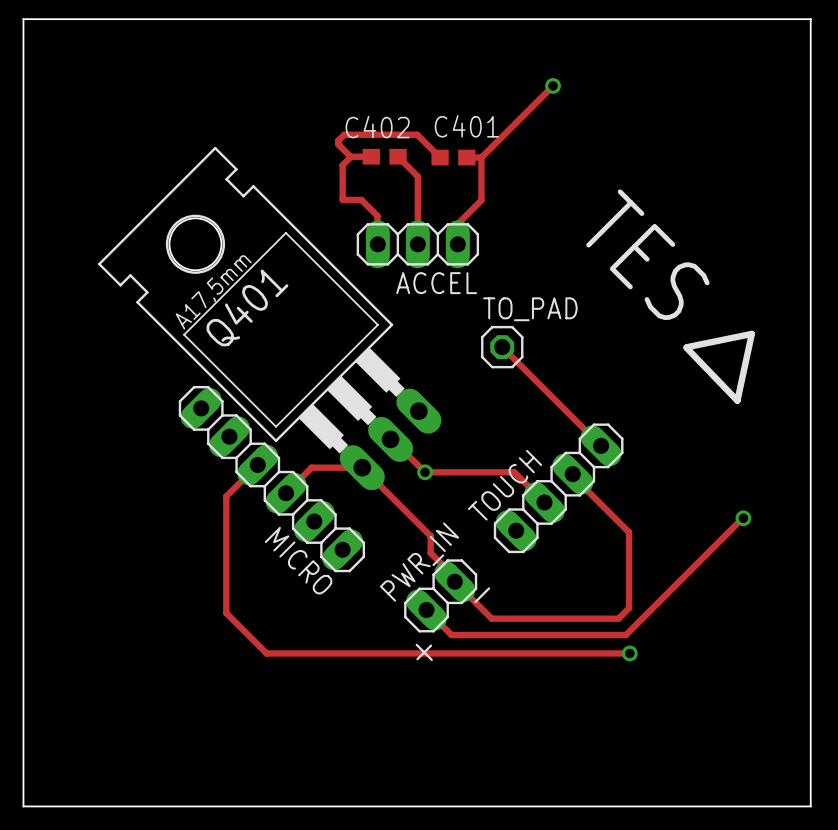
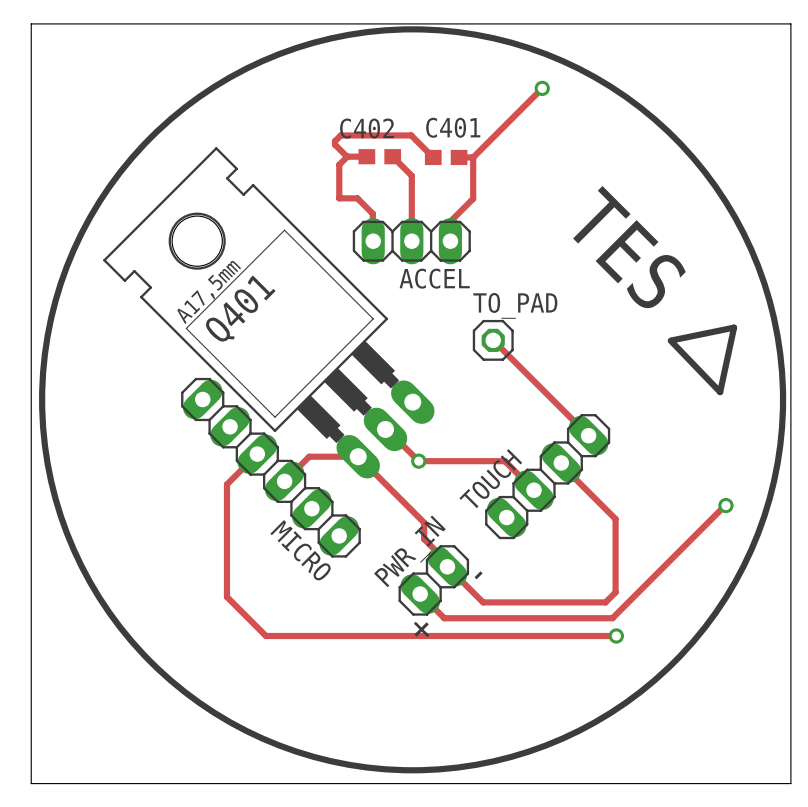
drawing: none -> [39, 26, 787, 774]

